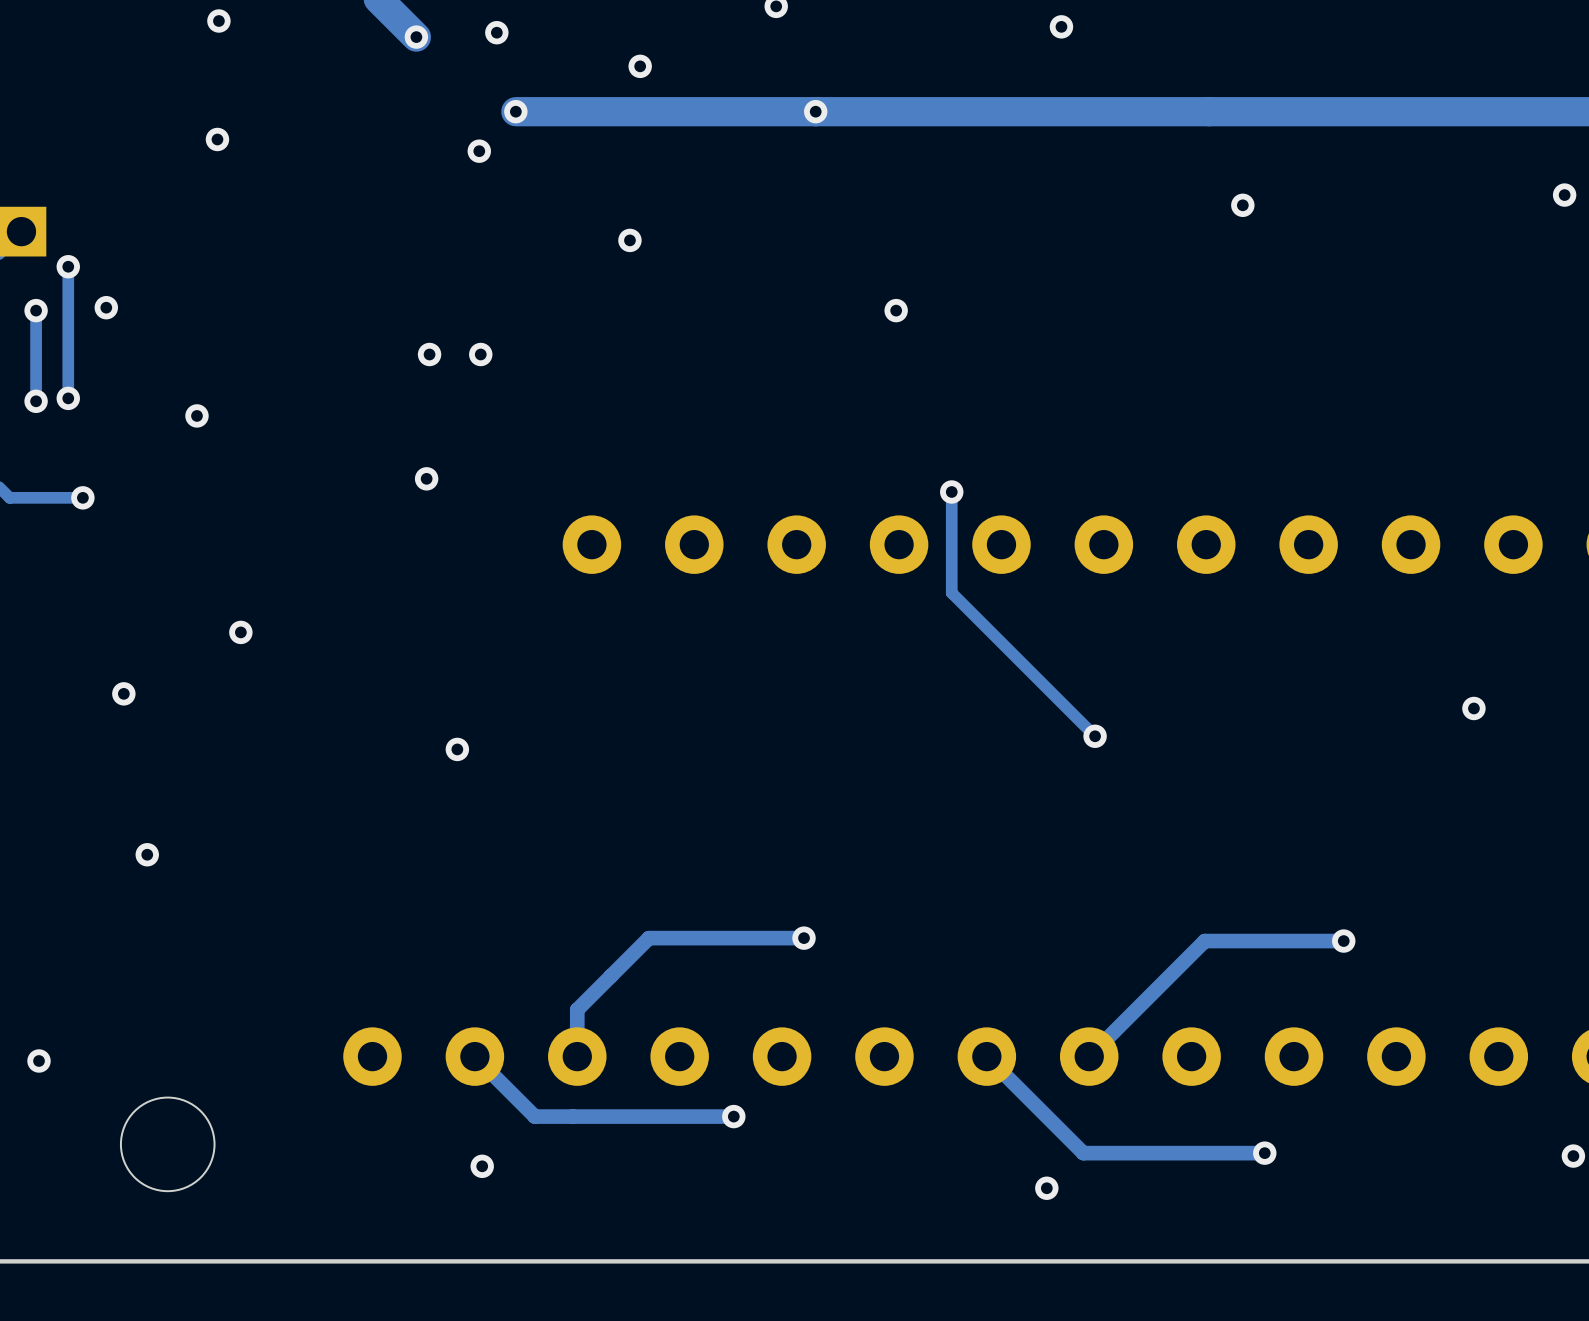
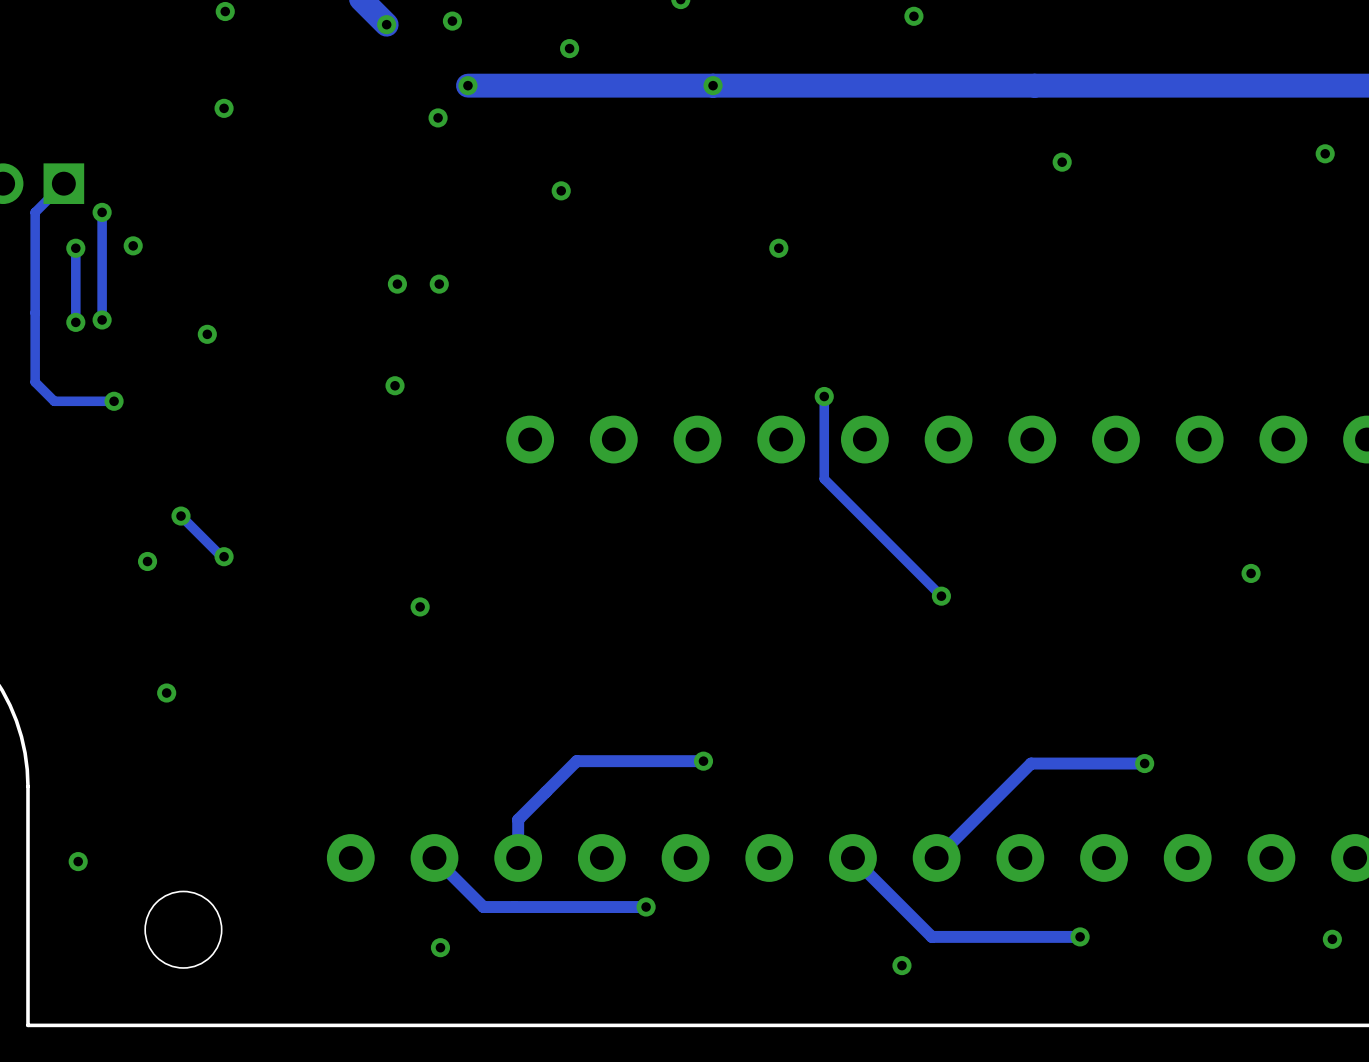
via: (240, 632) -> none
track: none -> (181, 516) (221, 556) (224, 556)
via: none -> (181, 516)
via: none -> (224, 556)

